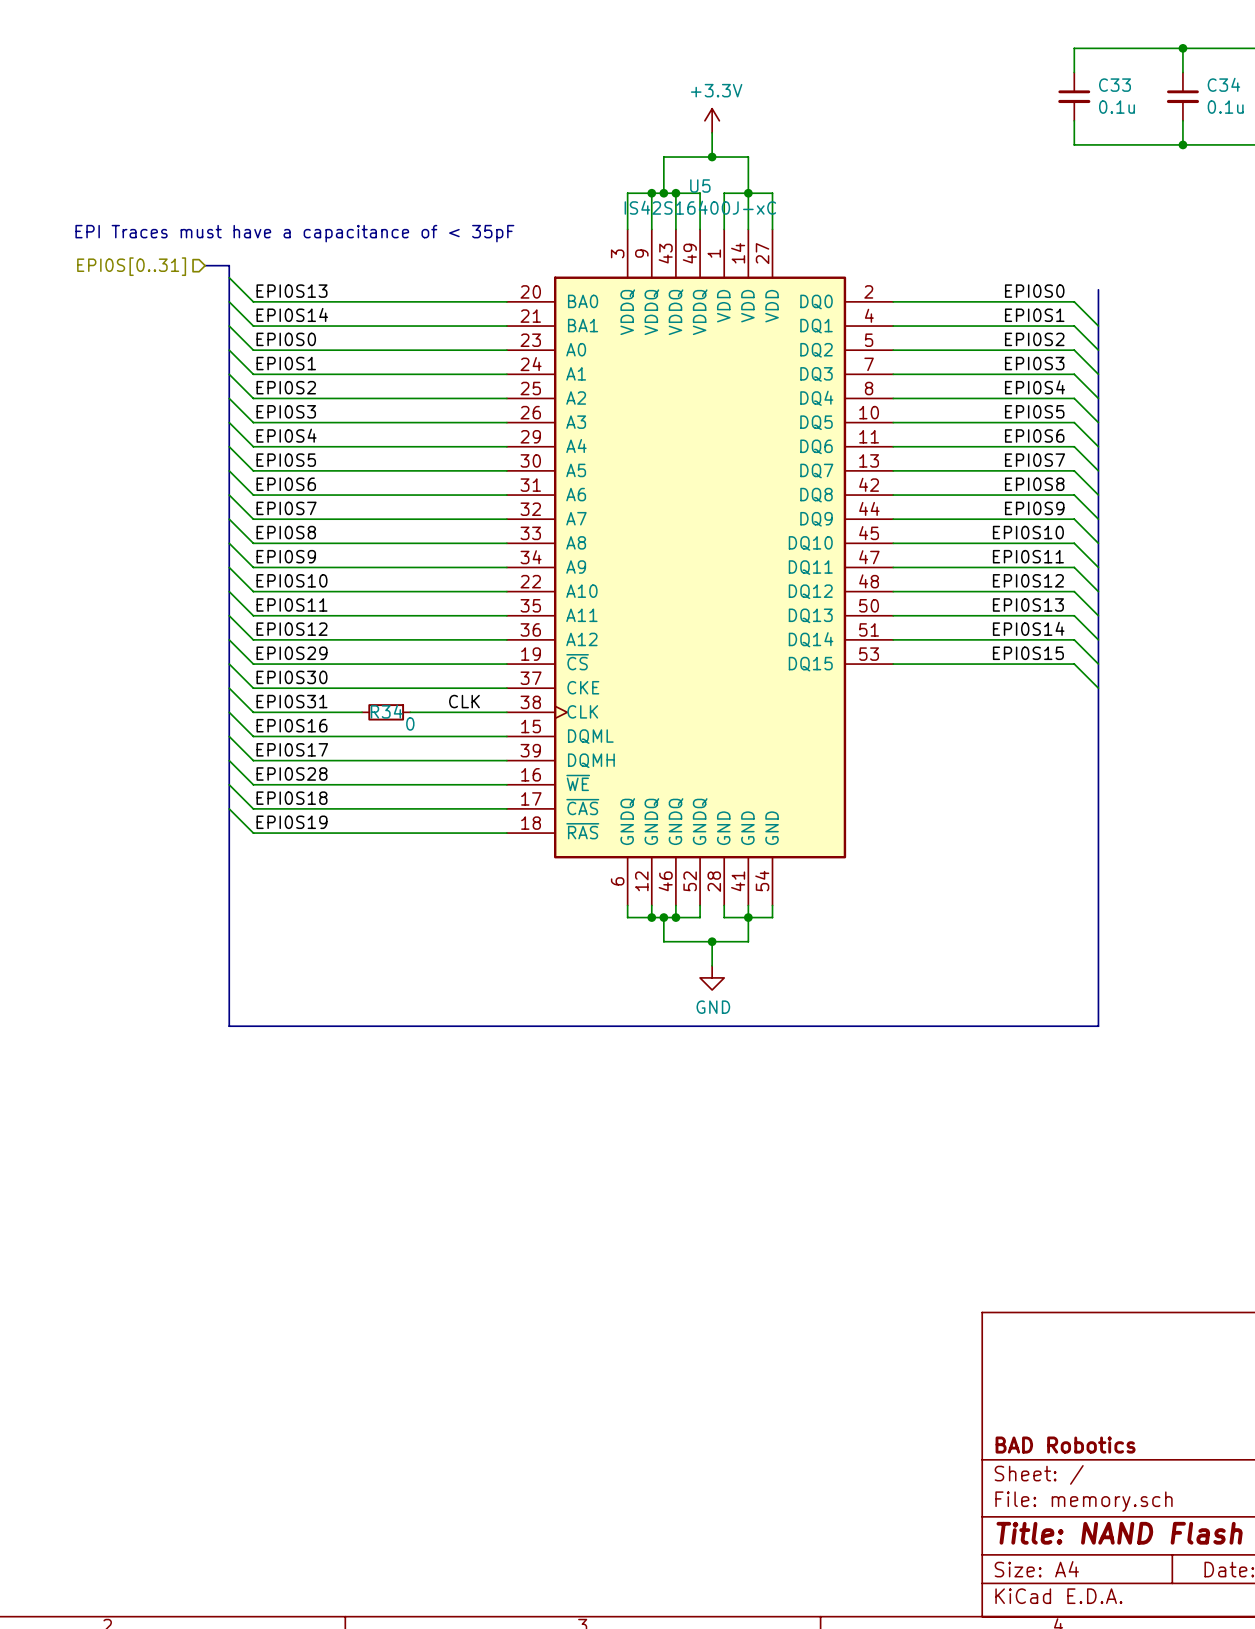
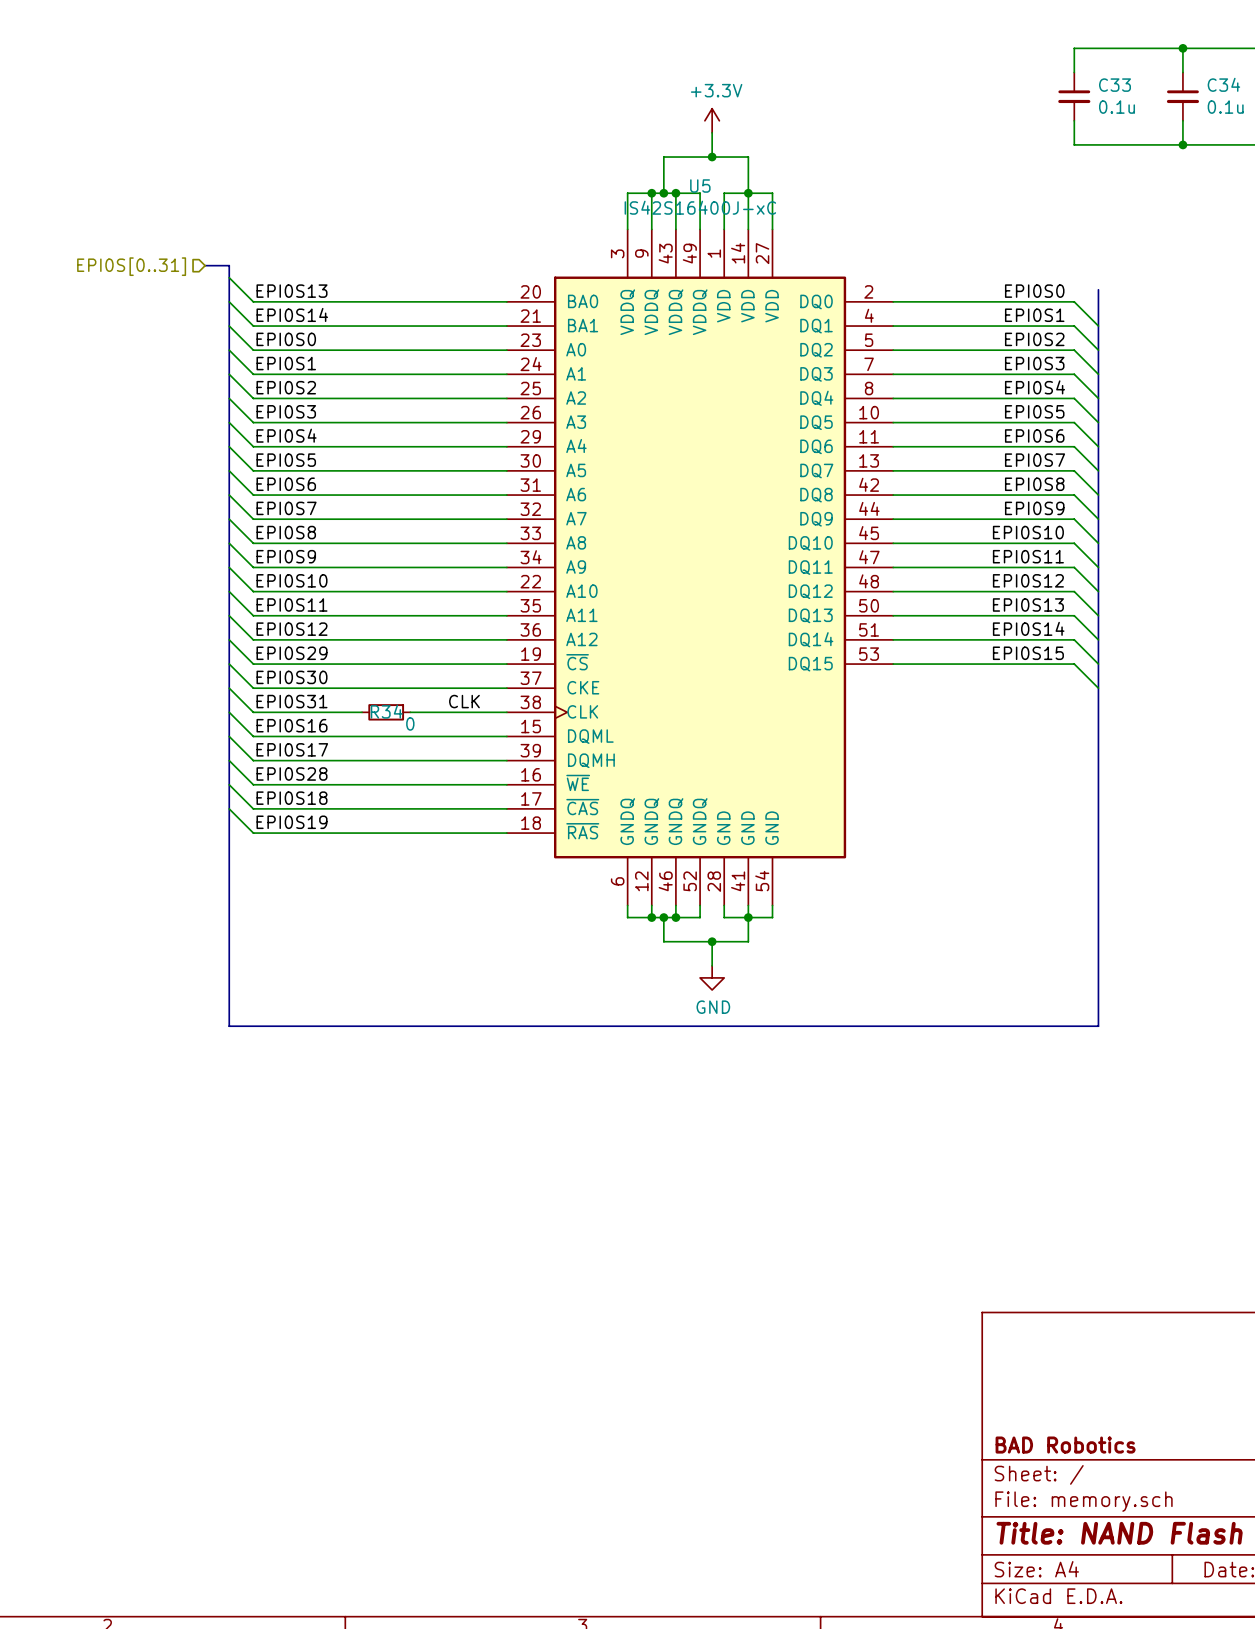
text: EPI Traces must have a capacitance of < 35pF (294, 233) -> none

